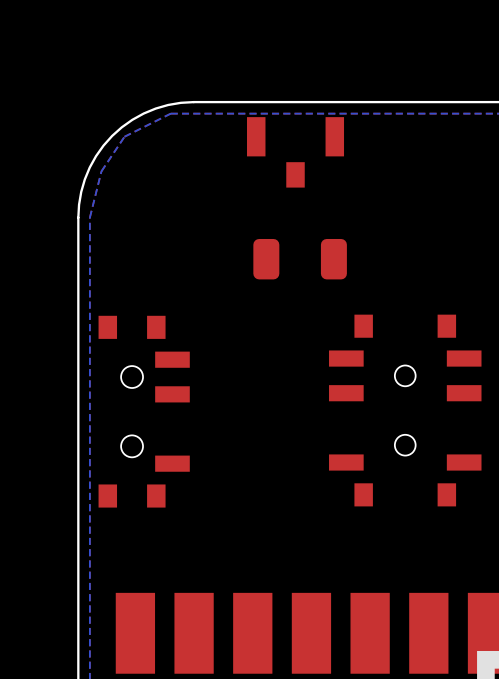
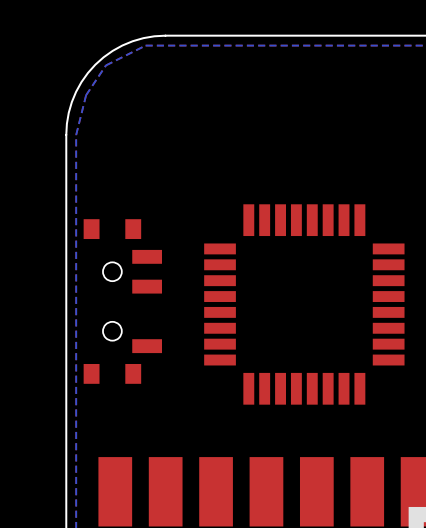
part: (295, 152) -> none
part: (300, 259) -> none
part: (405, 410) -> none
part: none -> (304, 304)

